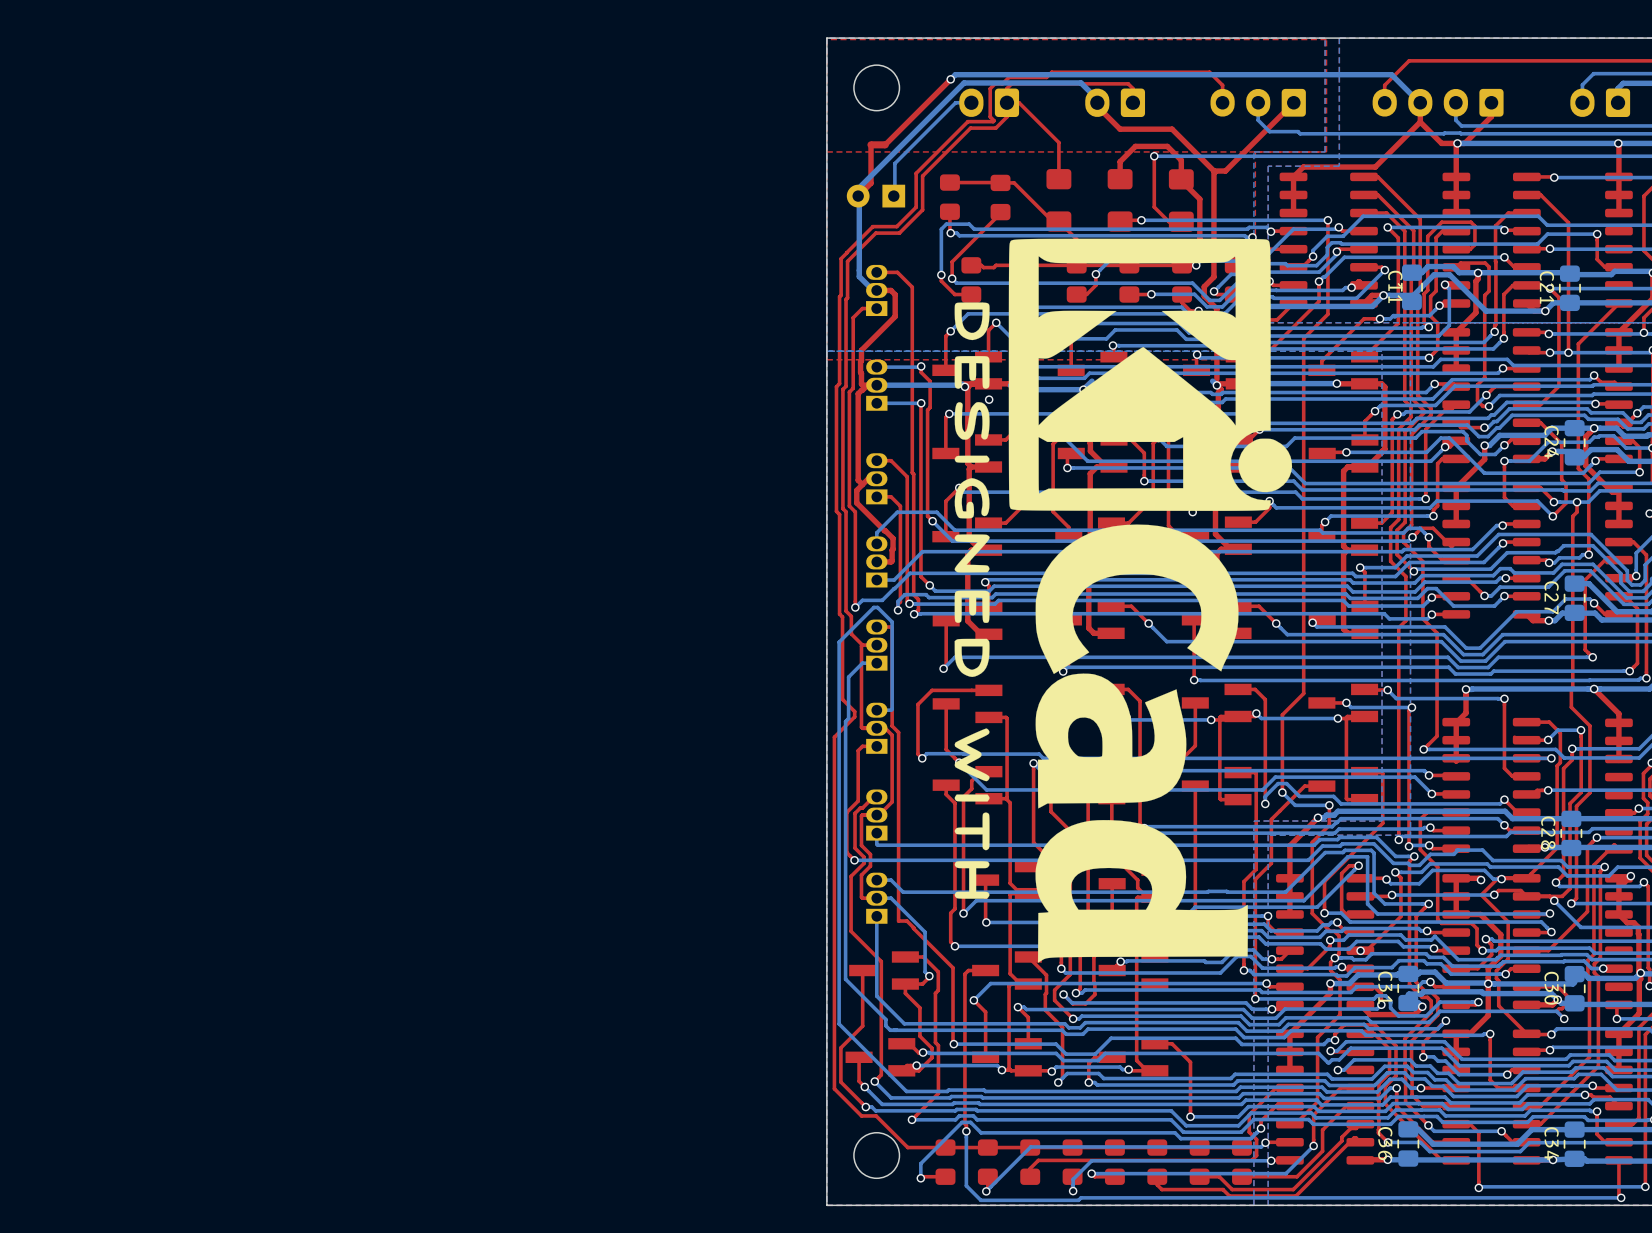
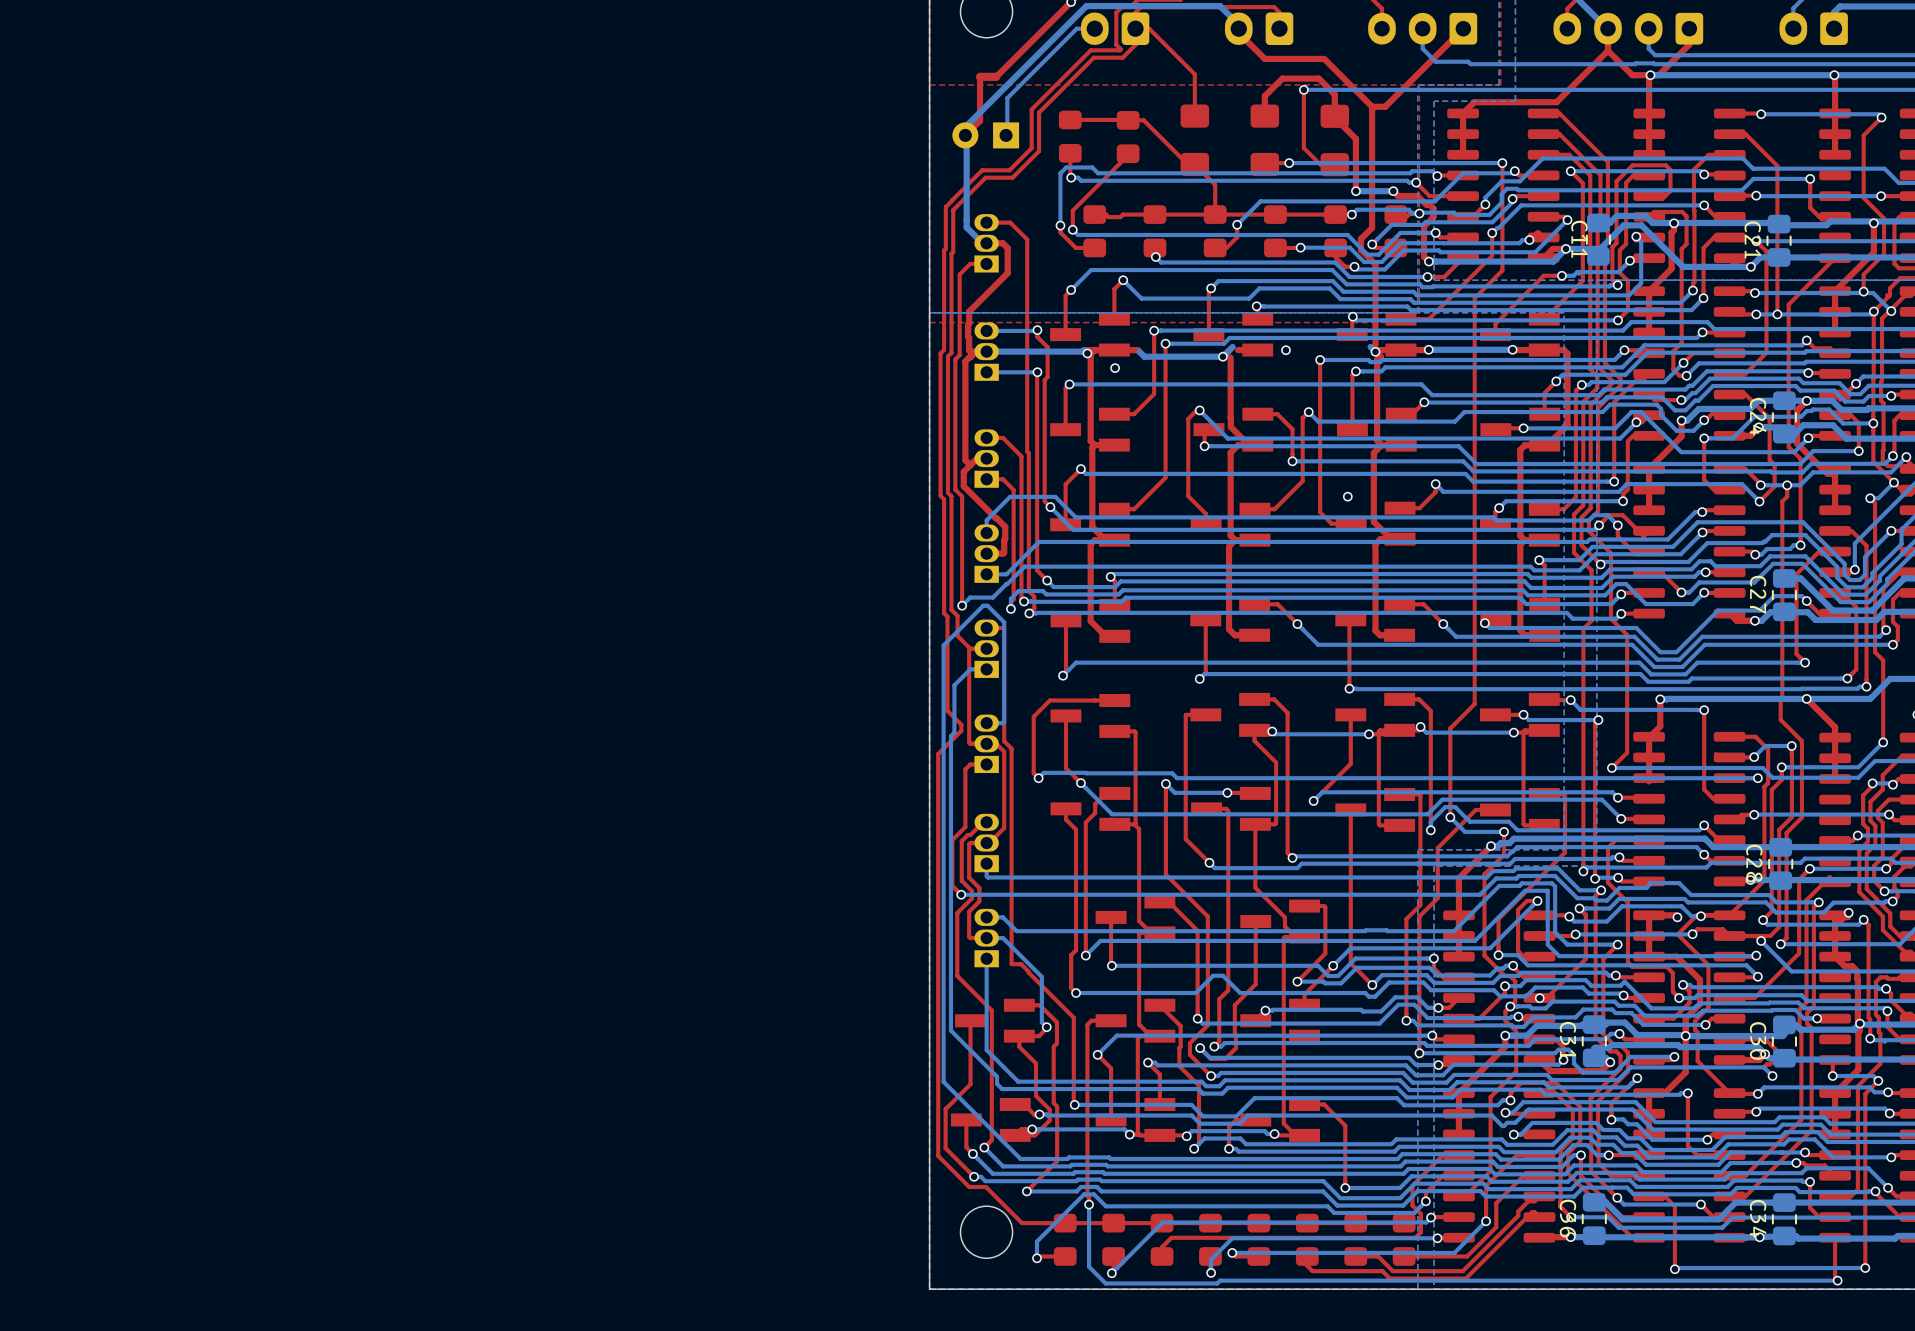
drawing: [954, 238, 1293, 963] -> none

